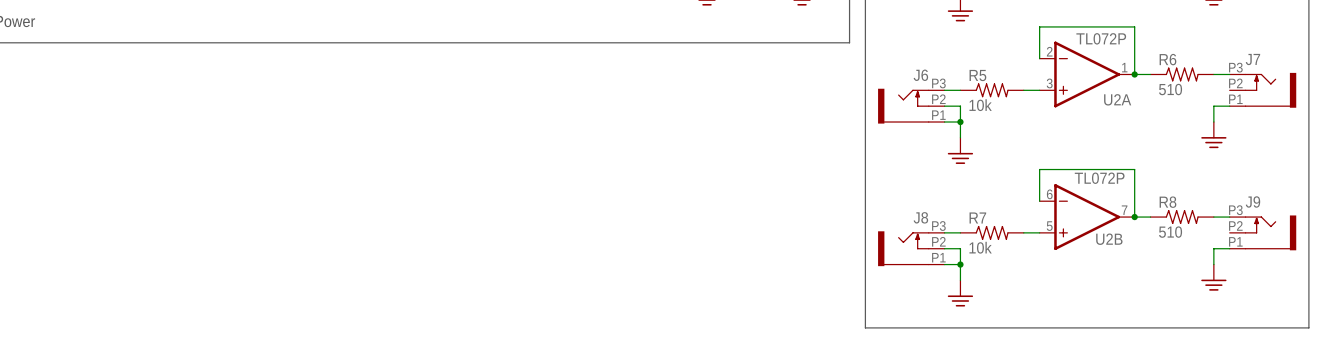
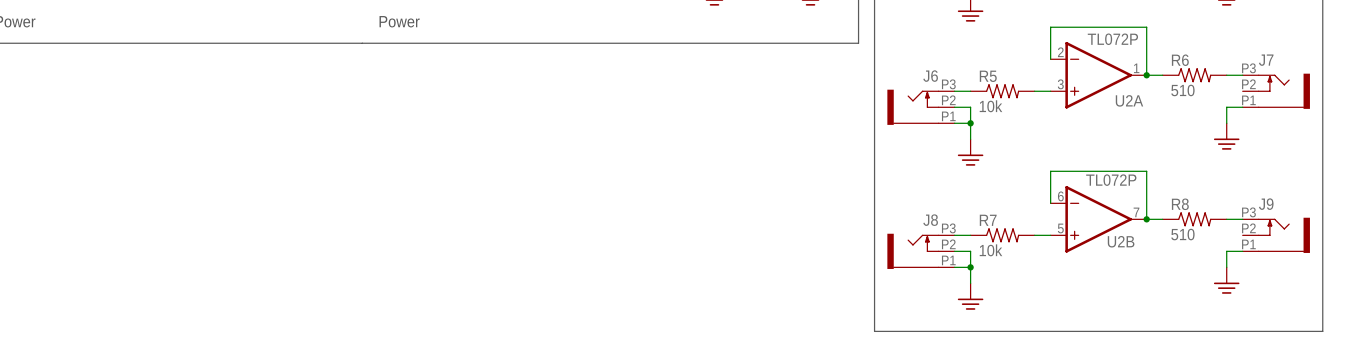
text: none -> Power (399, 21)

